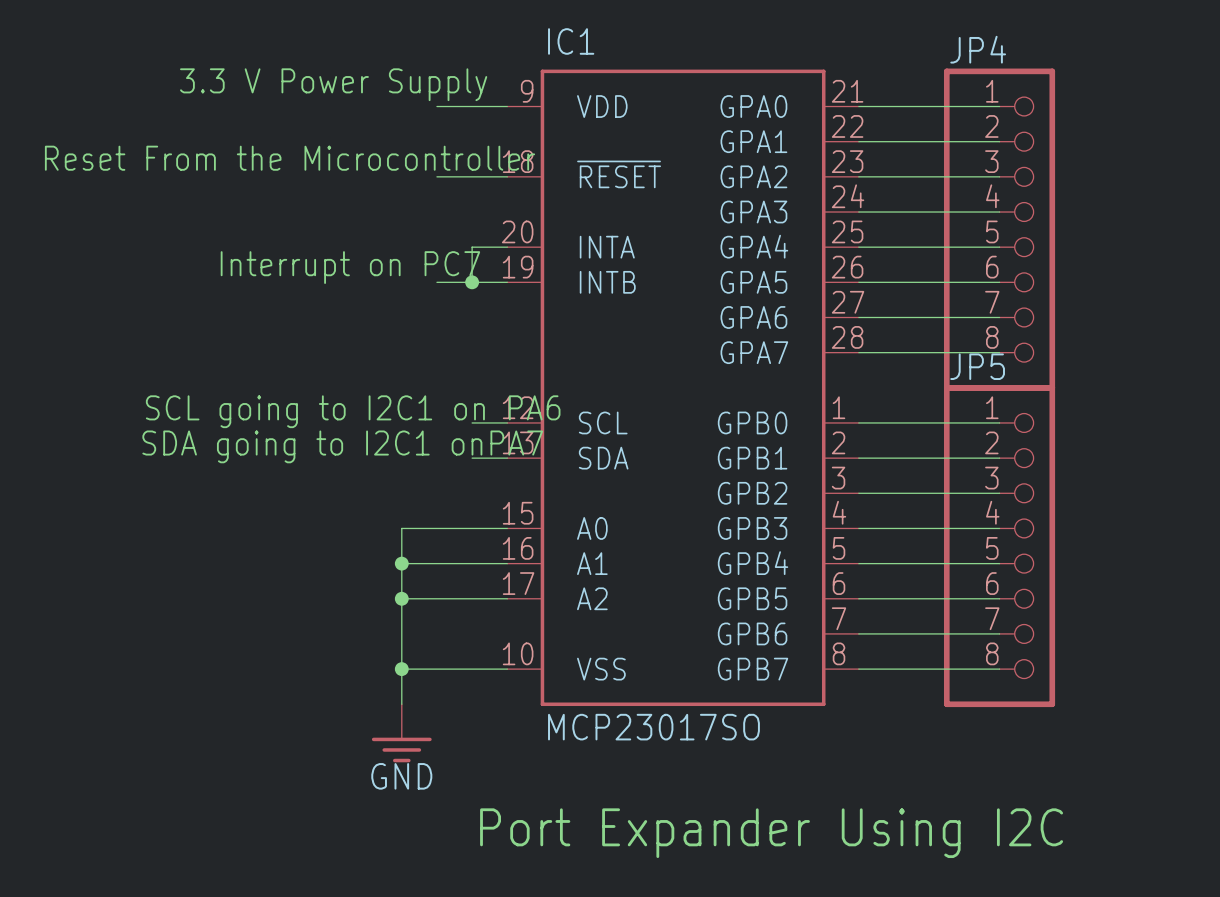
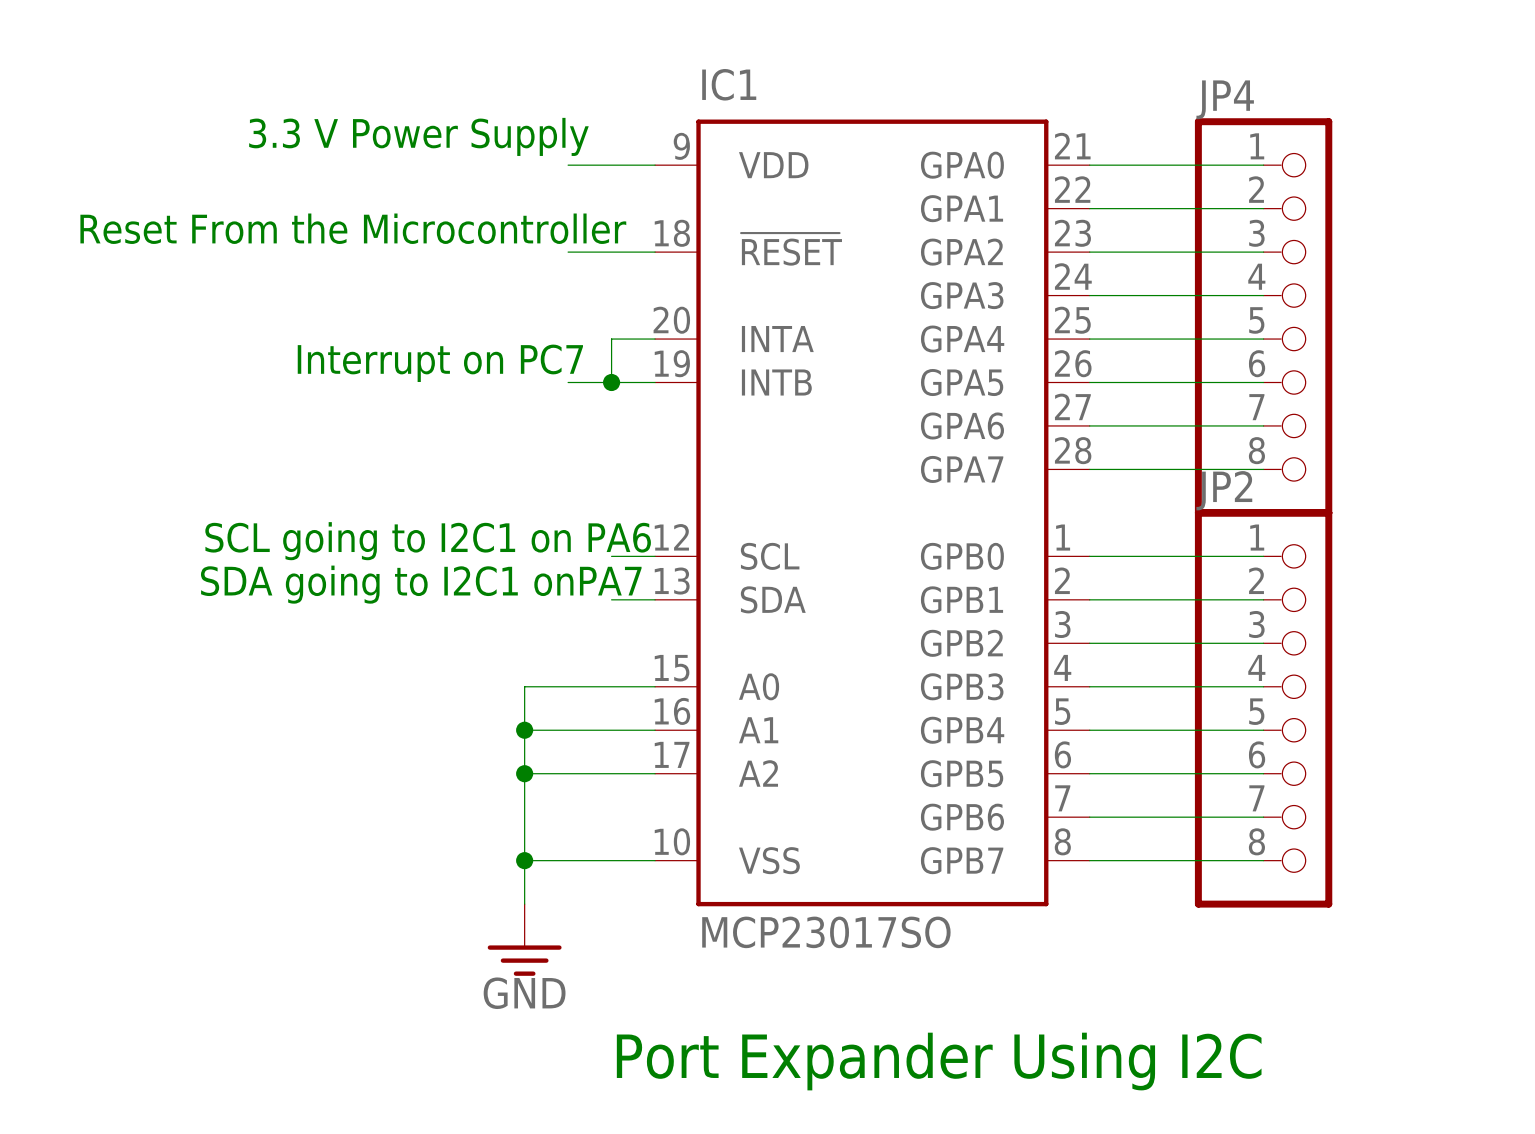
JP5 name: JP5 (977, 366) -> JP2 (1224, 490)

